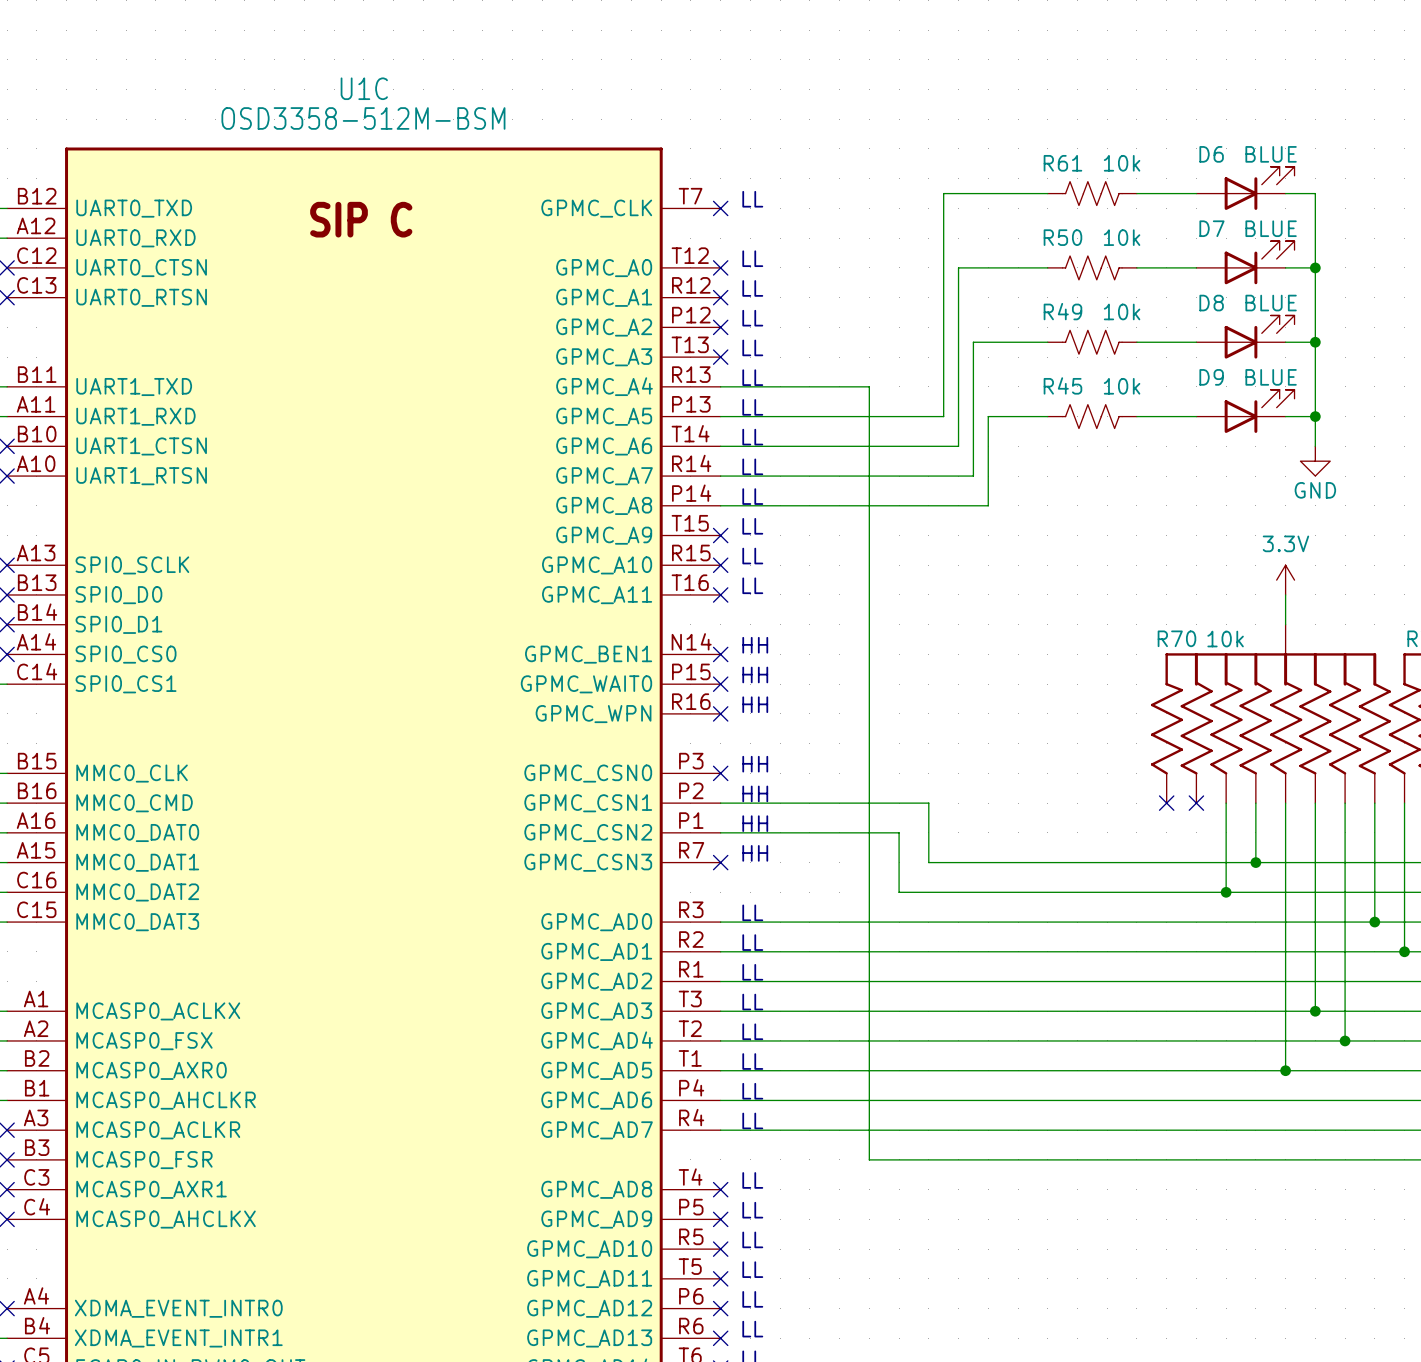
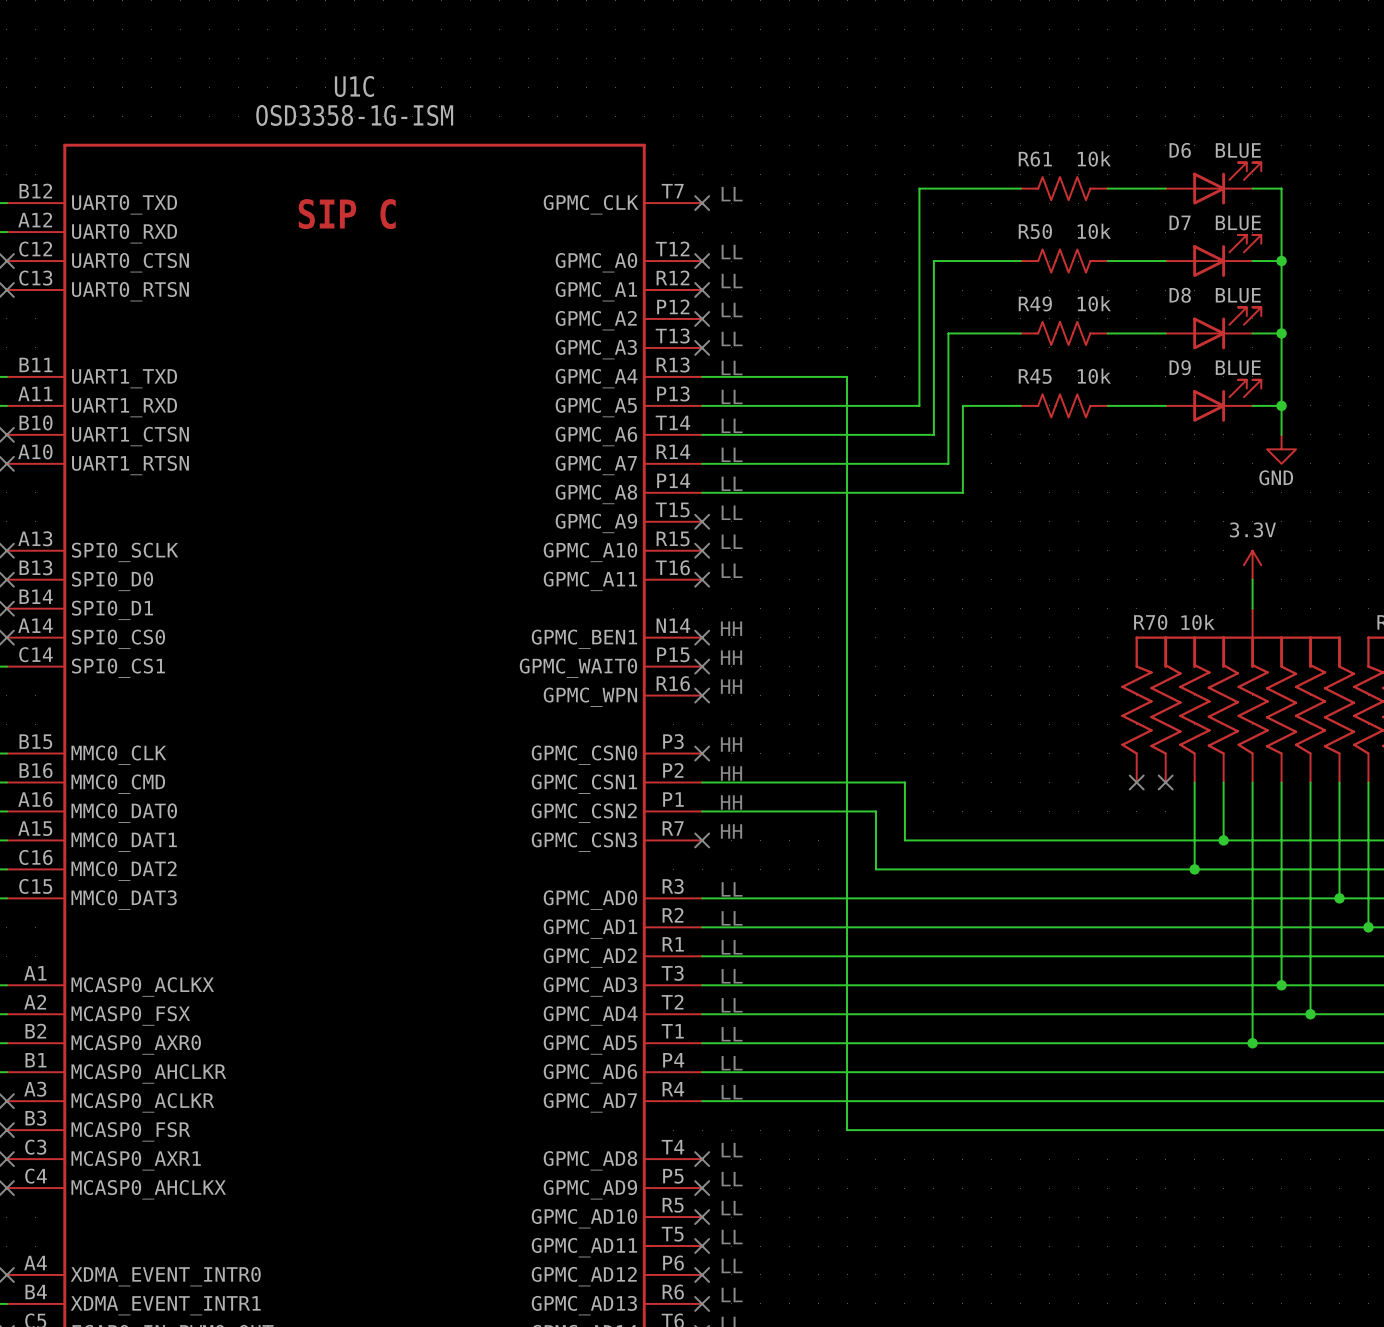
U1C value: OSD3358-512M-BSM (363, 118) -> OSD3358-1G-ISM (354, 115)

